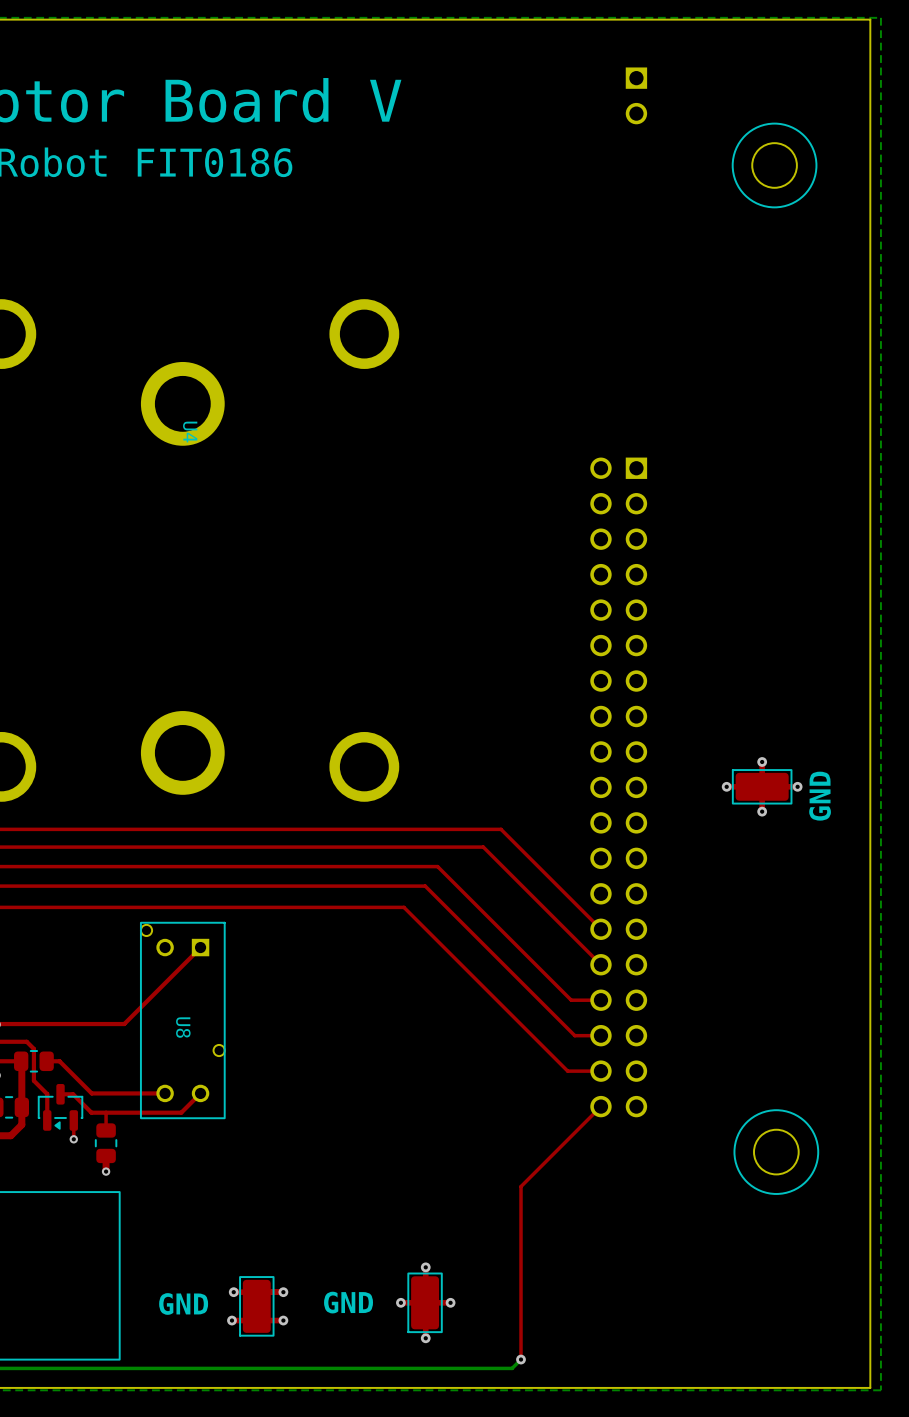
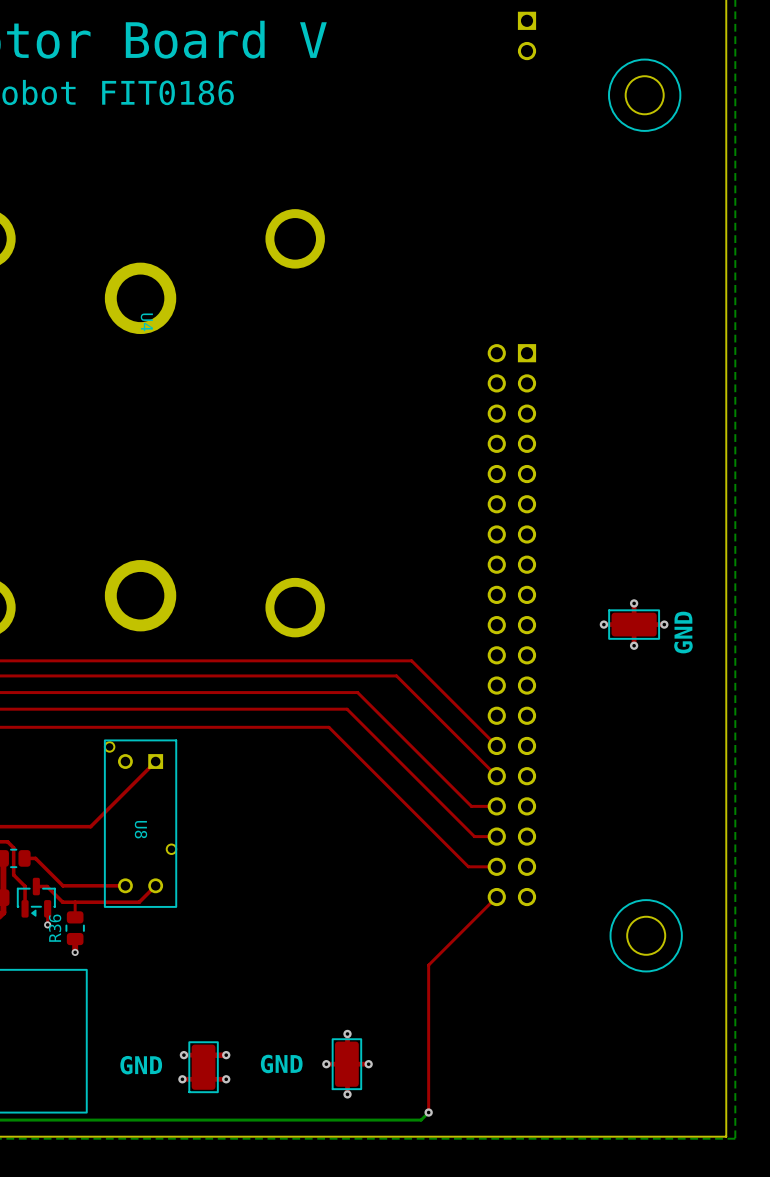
R36 name: none -> R36 (55, 928)

